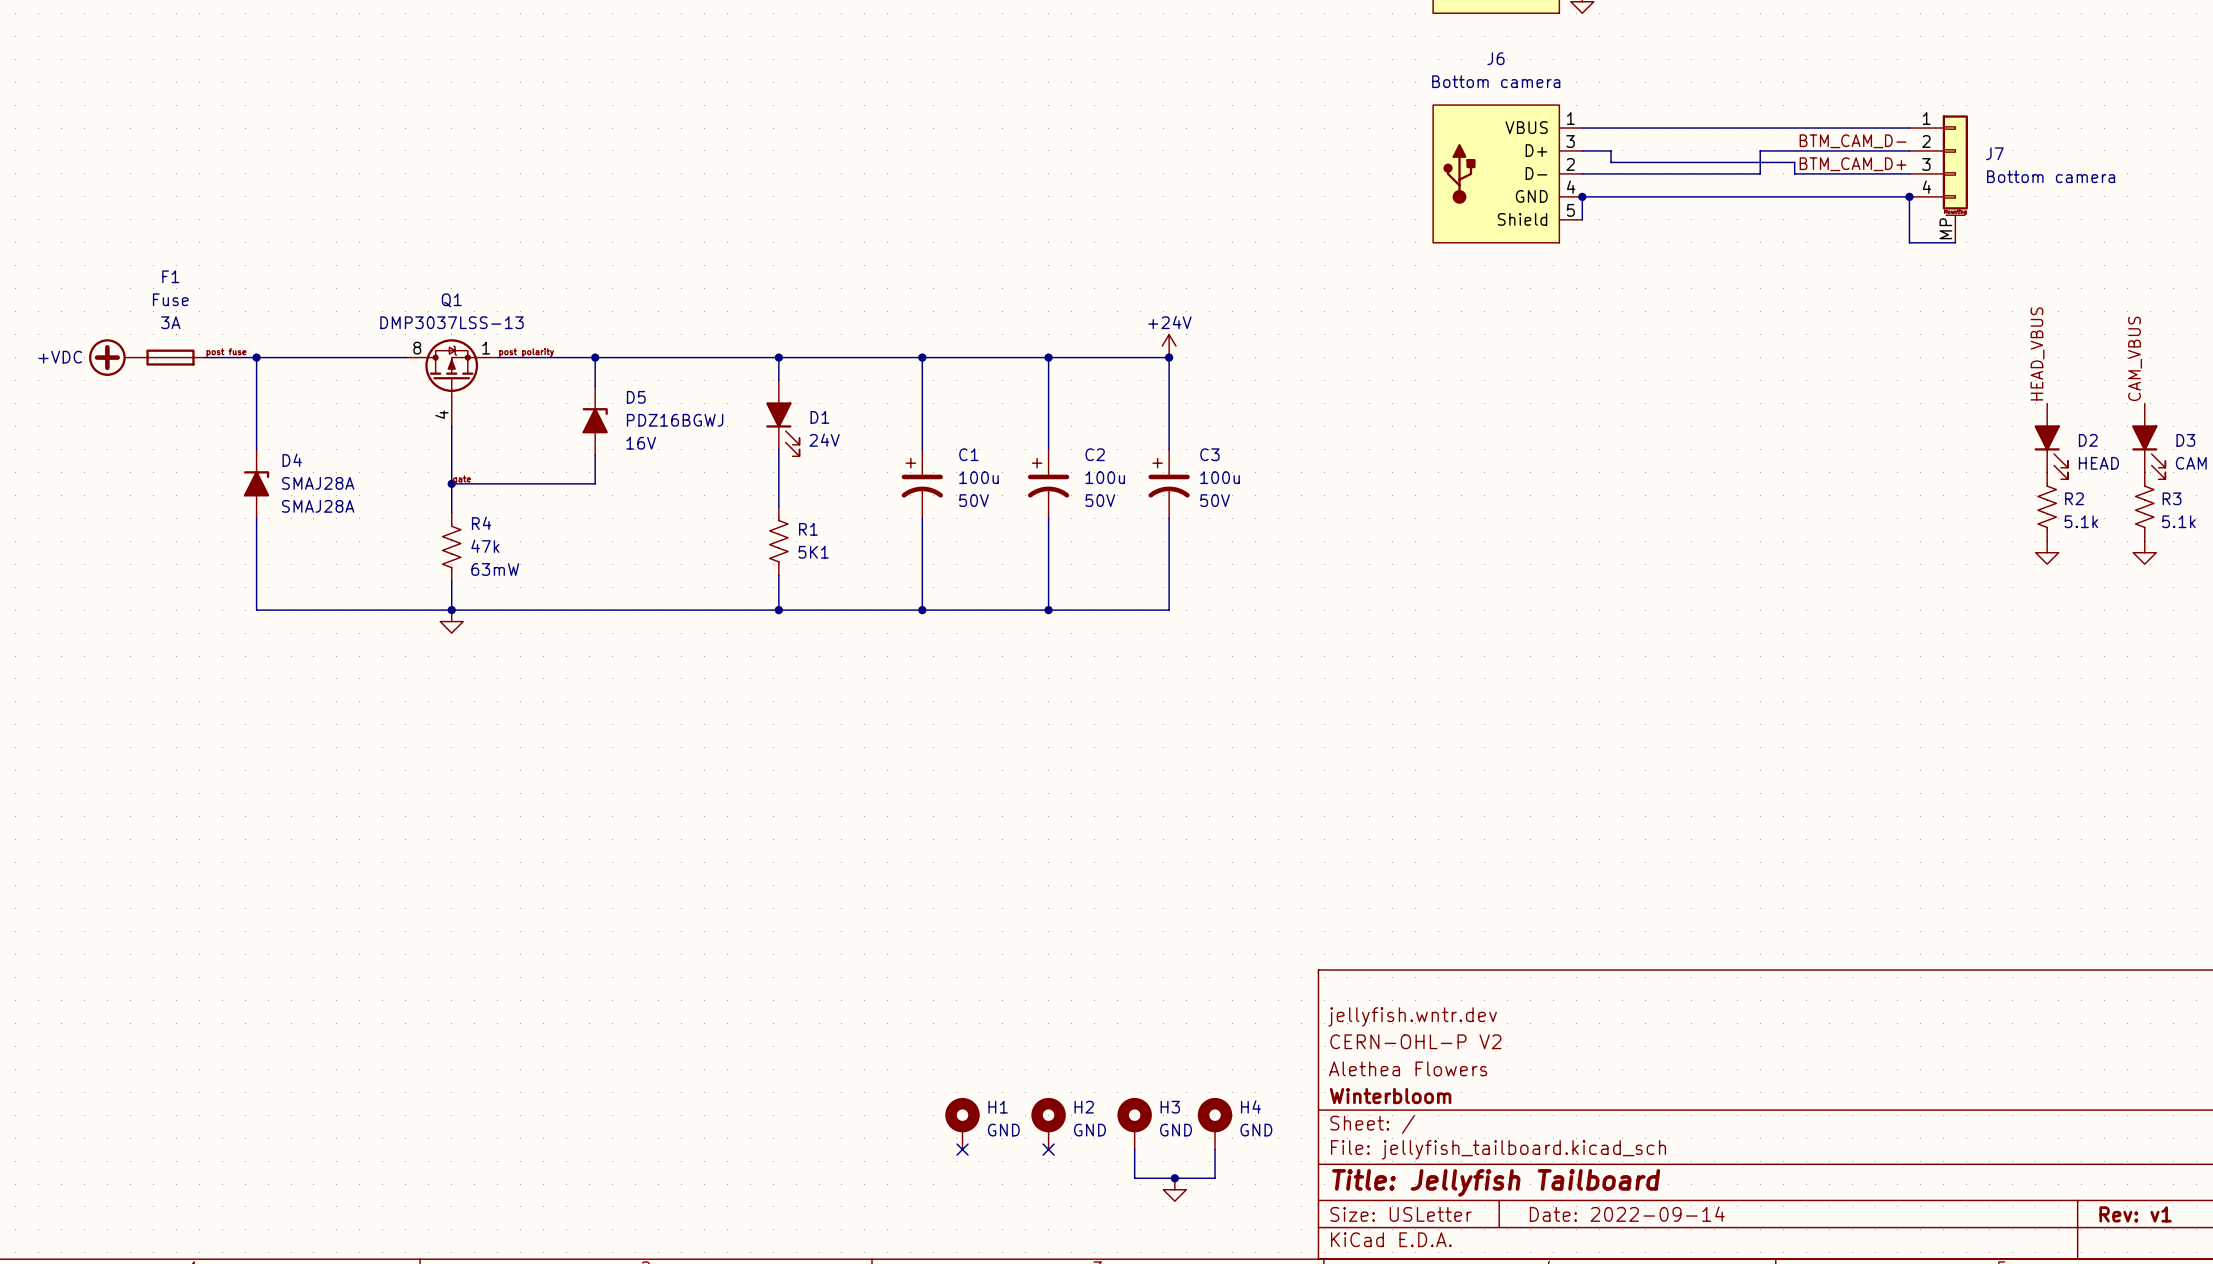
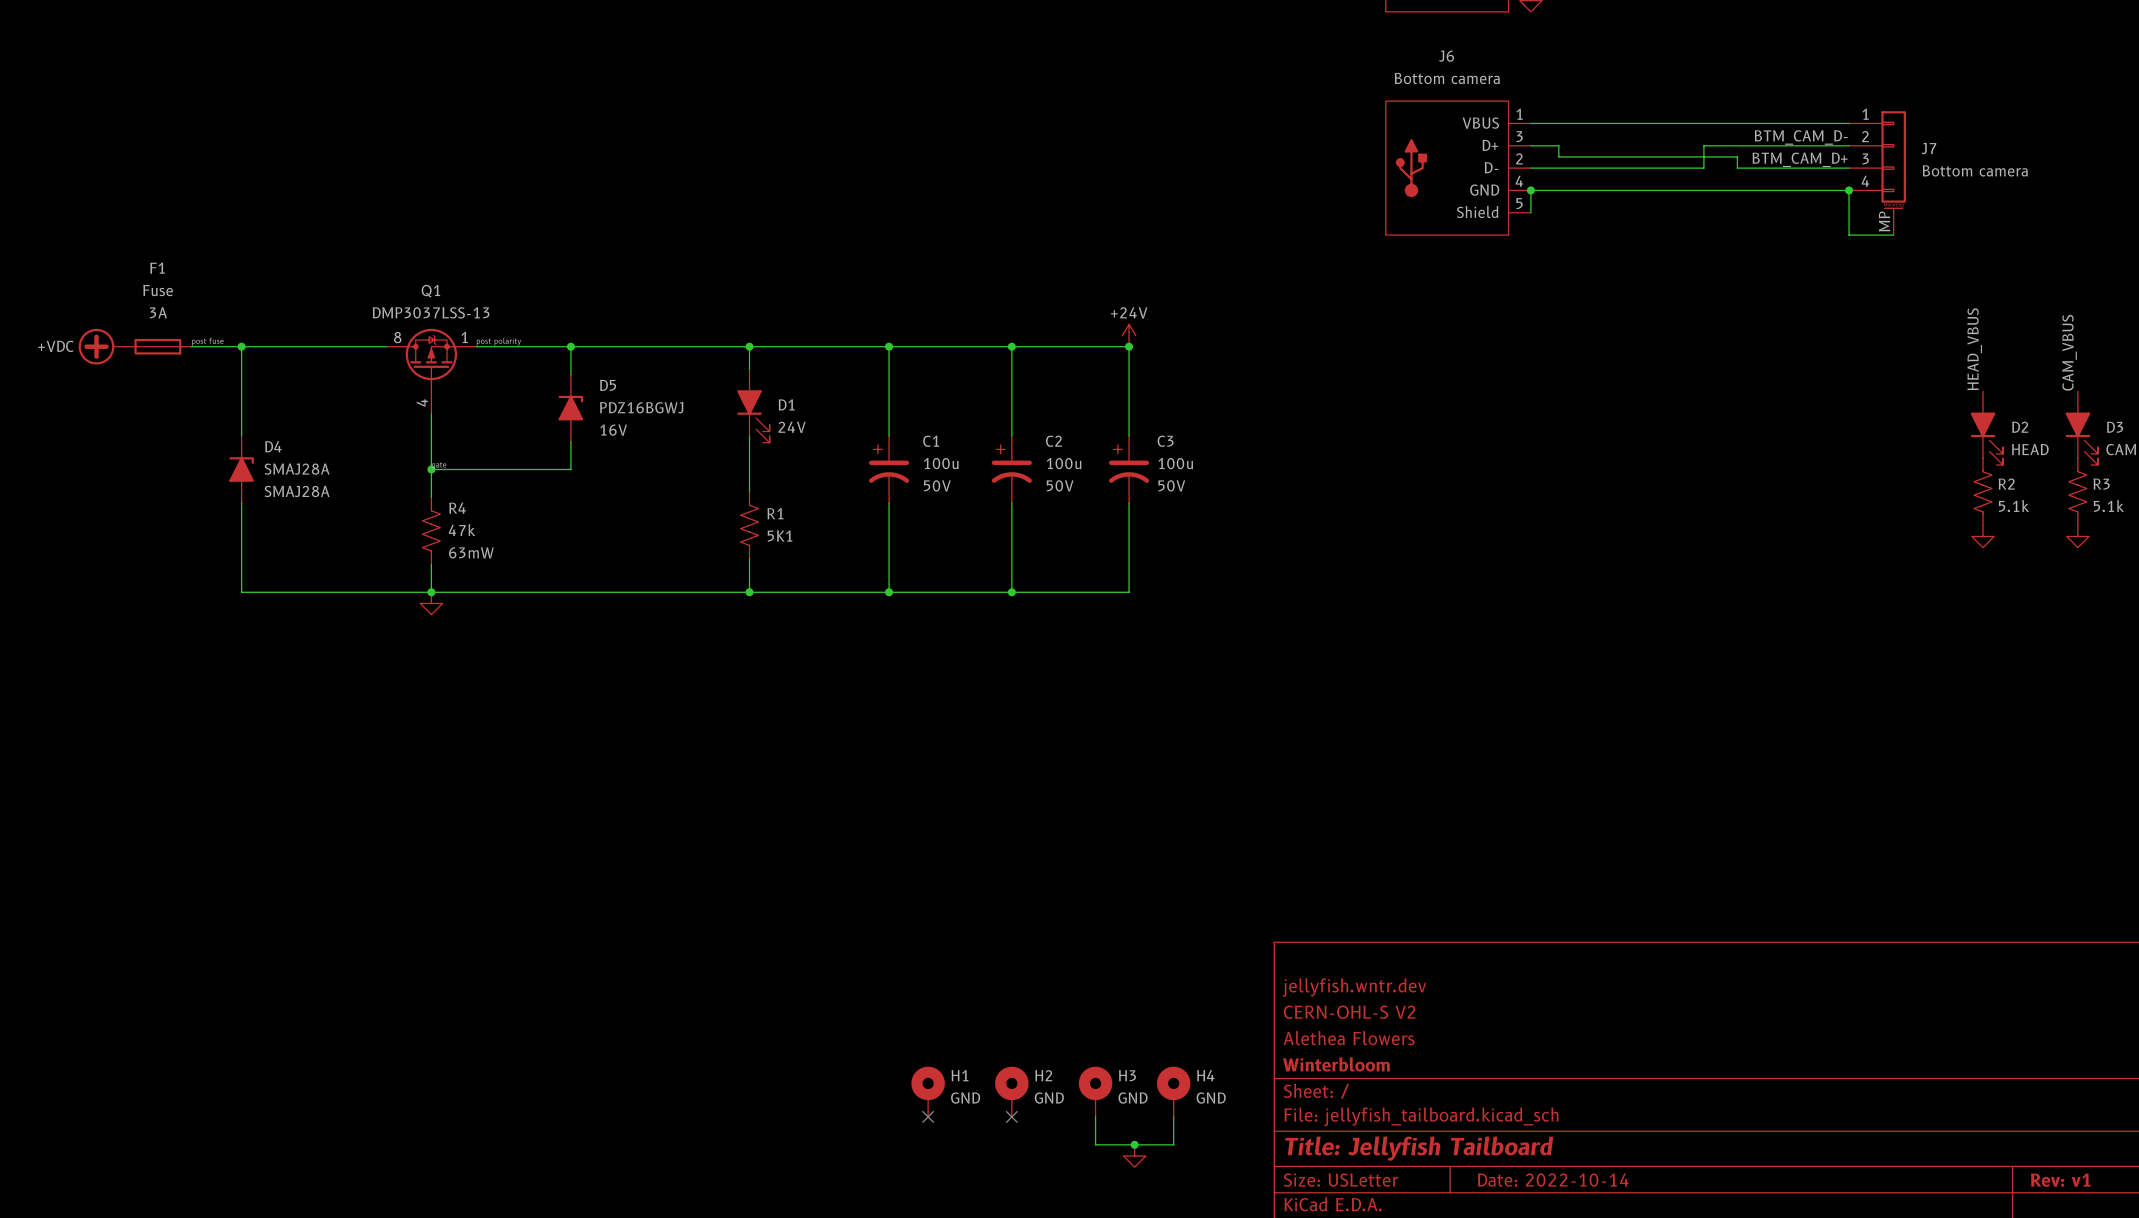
title block: CERN-OHL-P V2 (1415, 1041) -> CERN-OHL-S V2 (1349, 1012)
title block: Date: 2022-09-14 (1627, 1214) -> Date: 2022-10-14 (1553, 1180)

